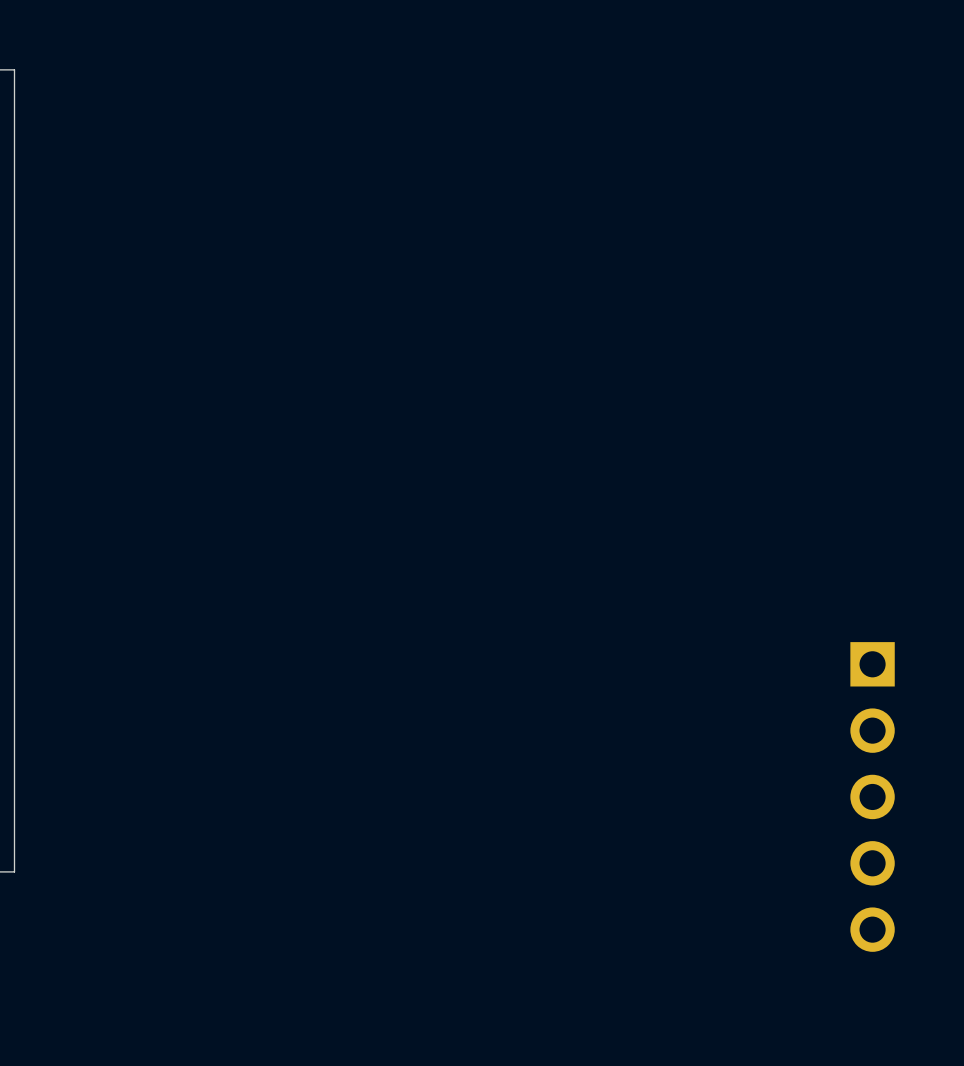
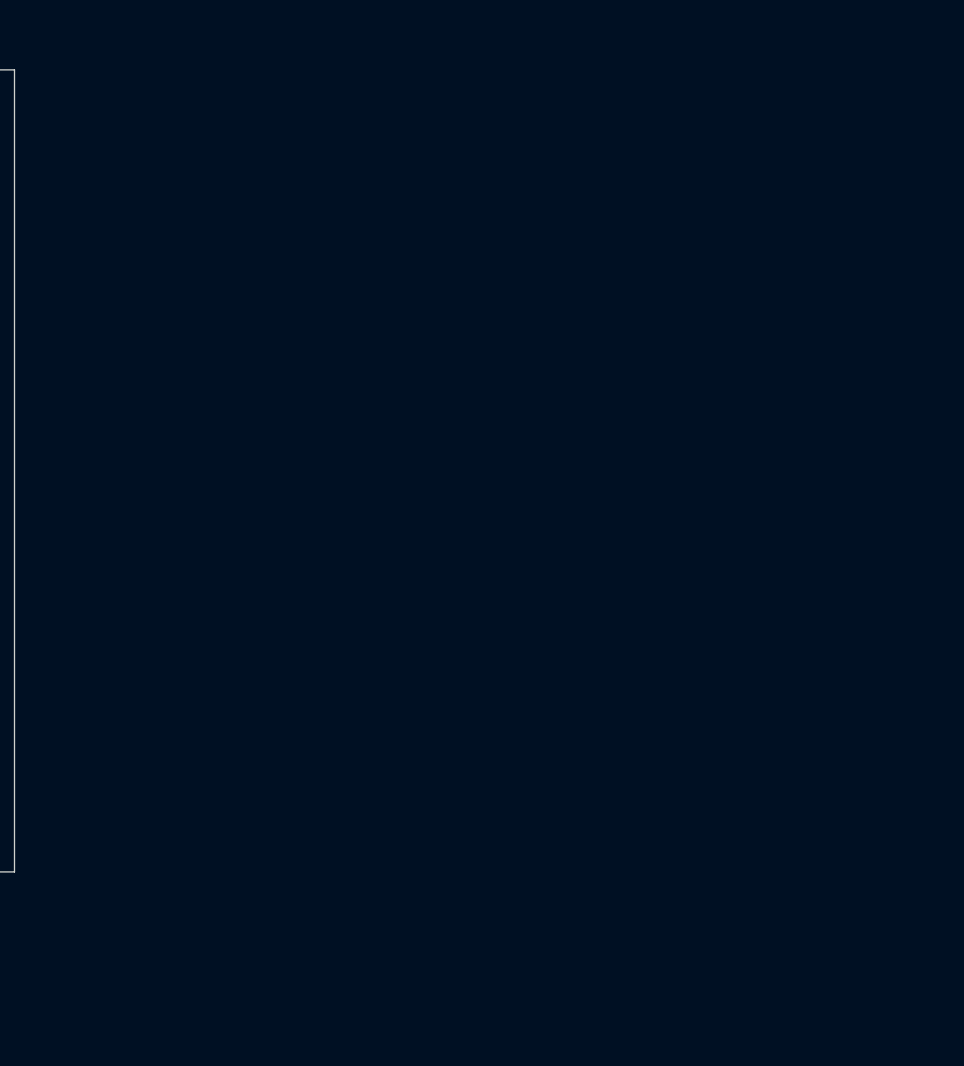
part: (872, 796) -> none

